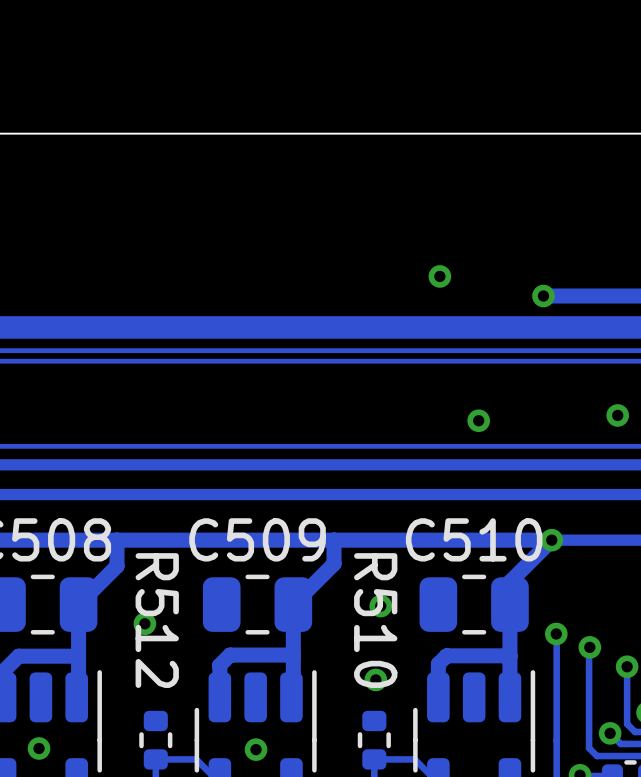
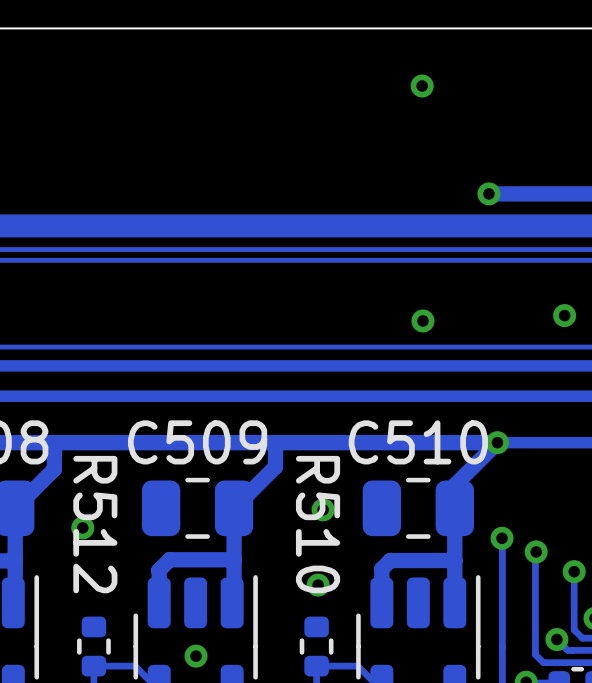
via position: (439, 276) -> (422, 86)

